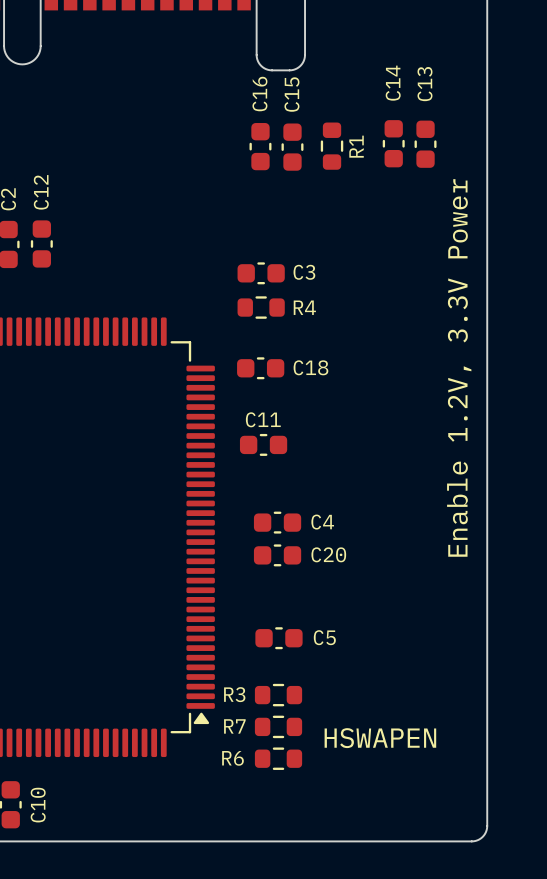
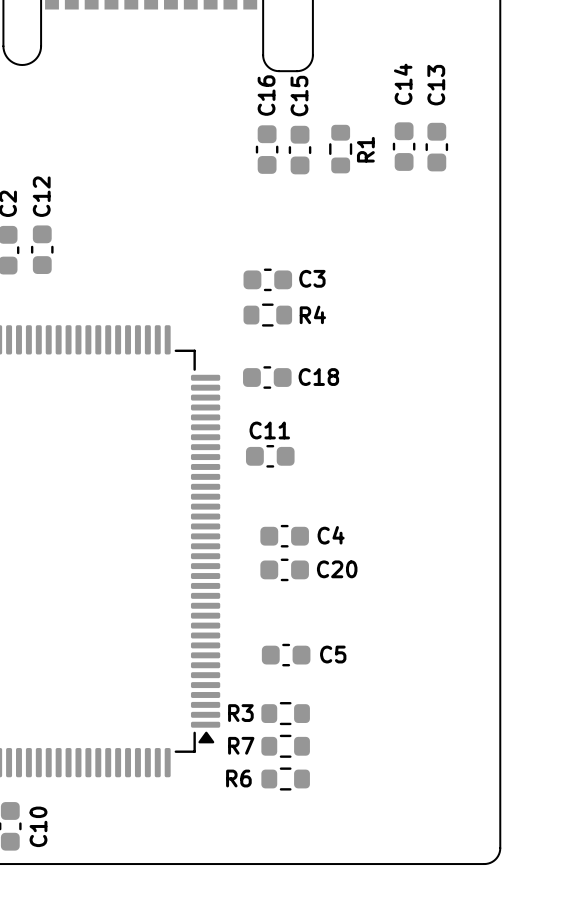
text: Enable 1.2V, 3.3V Power (459, 367) -> none
text: HSWAPEN (380, 738) -> none

